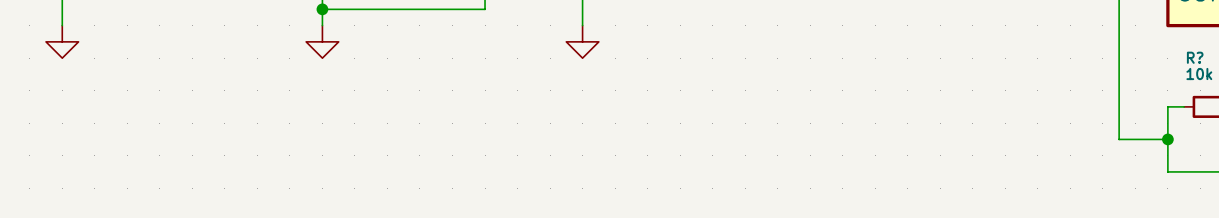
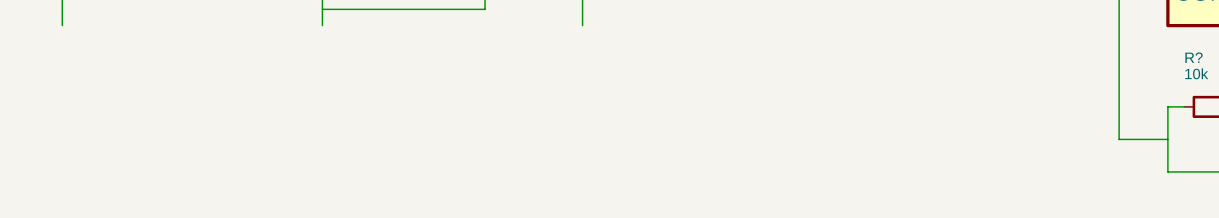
junction: (322, 9) -> none
power symbol: (62, 41) -> none
power symbol: (322, 41) -> none
power symbol: (582, 41) -> none
junction: (1167, 139) -> none

